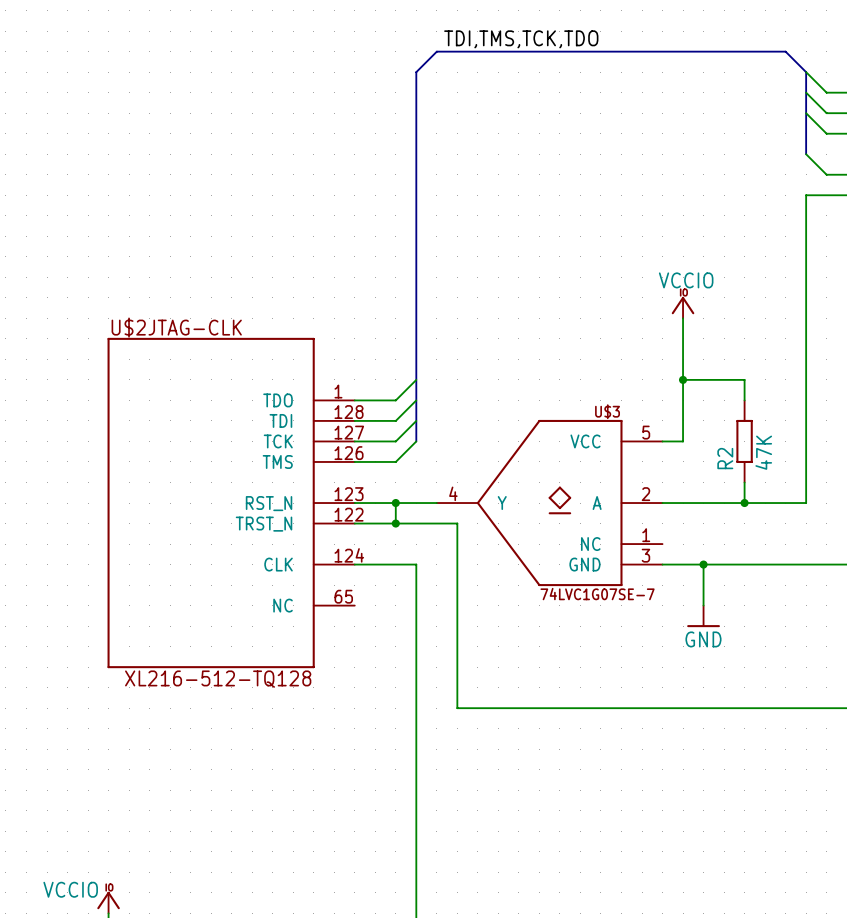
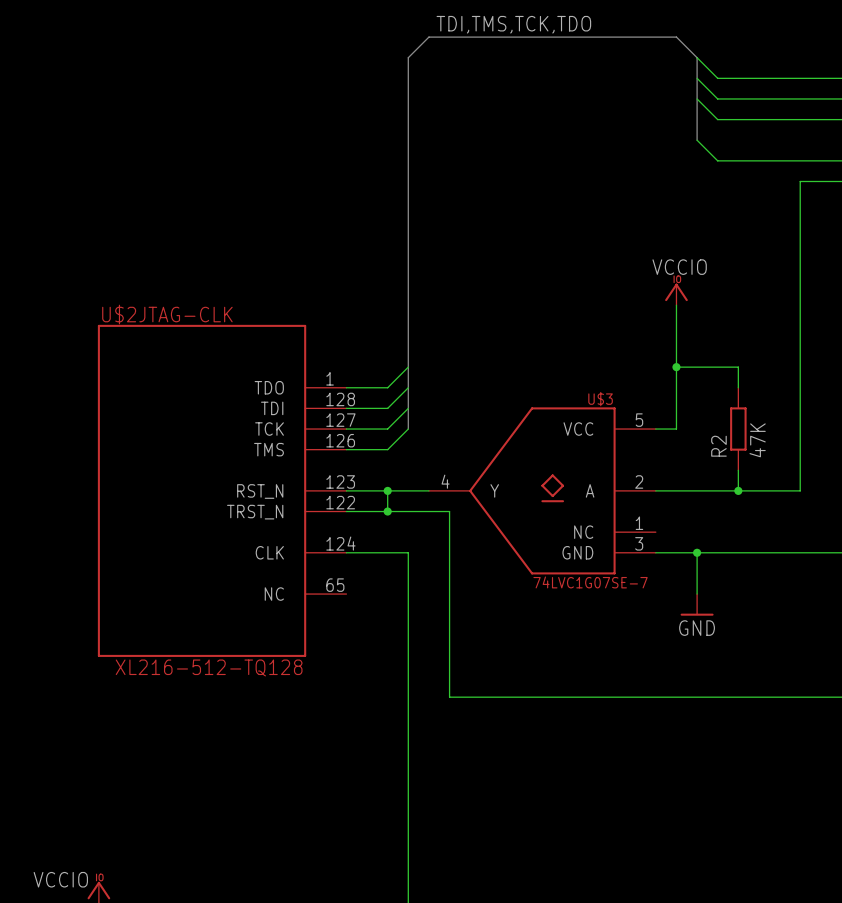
bus: (683, 51) (785, 51) (806, 72) (806, 154) -> (676, 37) (697, 57) (697, 140)
wire: (806, 72) (826, 92) -> (697, 57) (717, 78) (820, 78)
wire: (806, 92) (826, 113) -> (697, 78) (717, 98) (820, 98)
wire: (806, 113) (826, 133) -> (697, 98) (717, 119) (820, 119)
wire: (806, 154) (826, 174) -> (697, 140) (717, 160) (820, 160)

